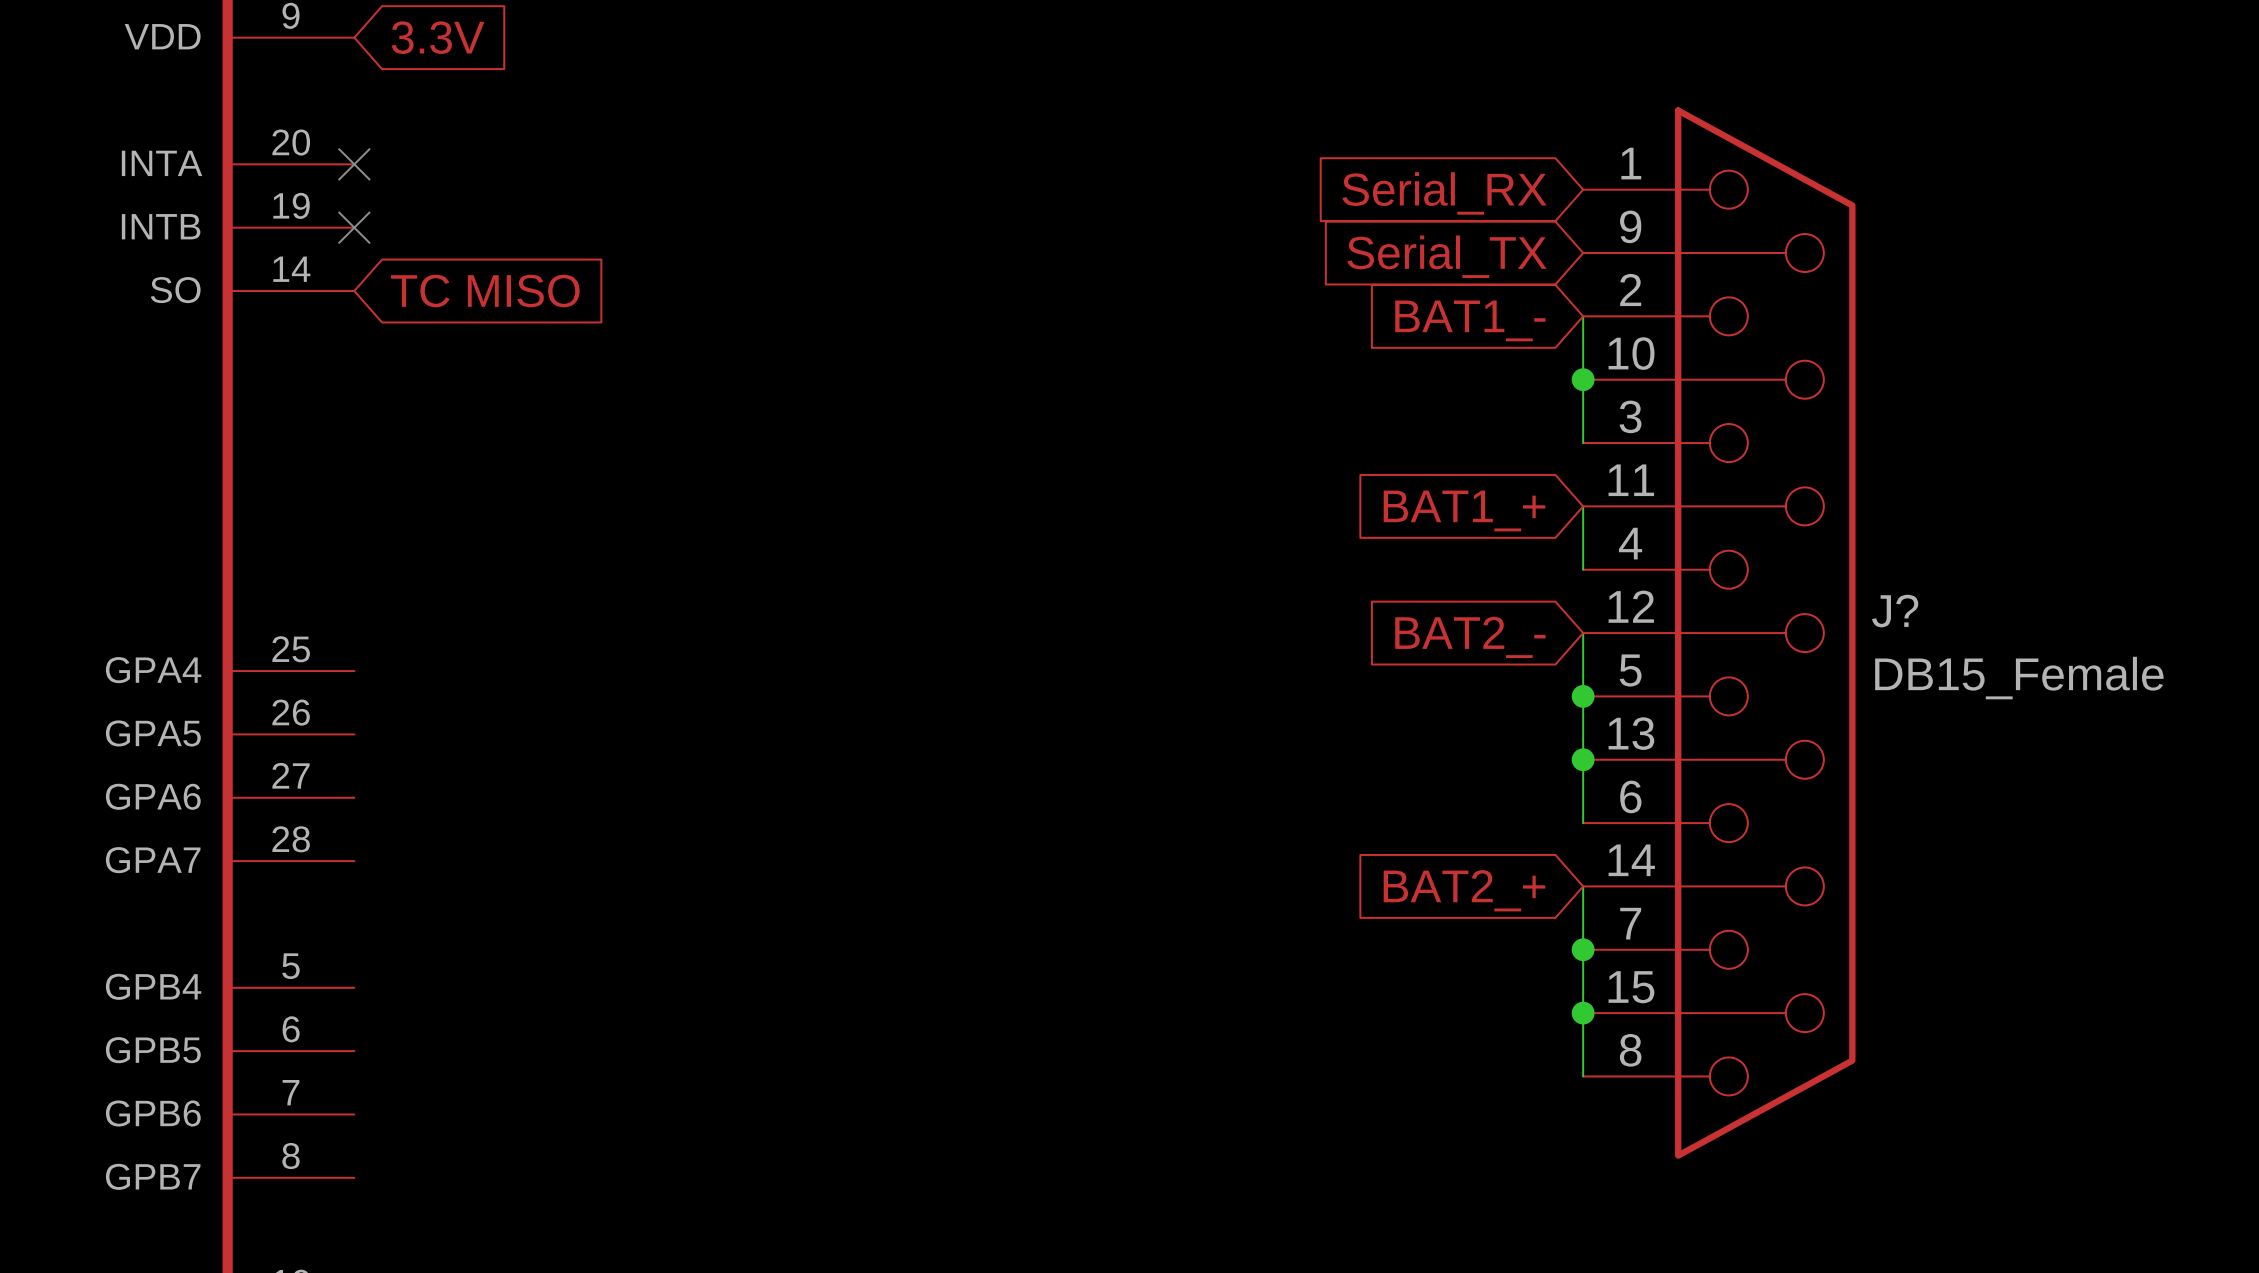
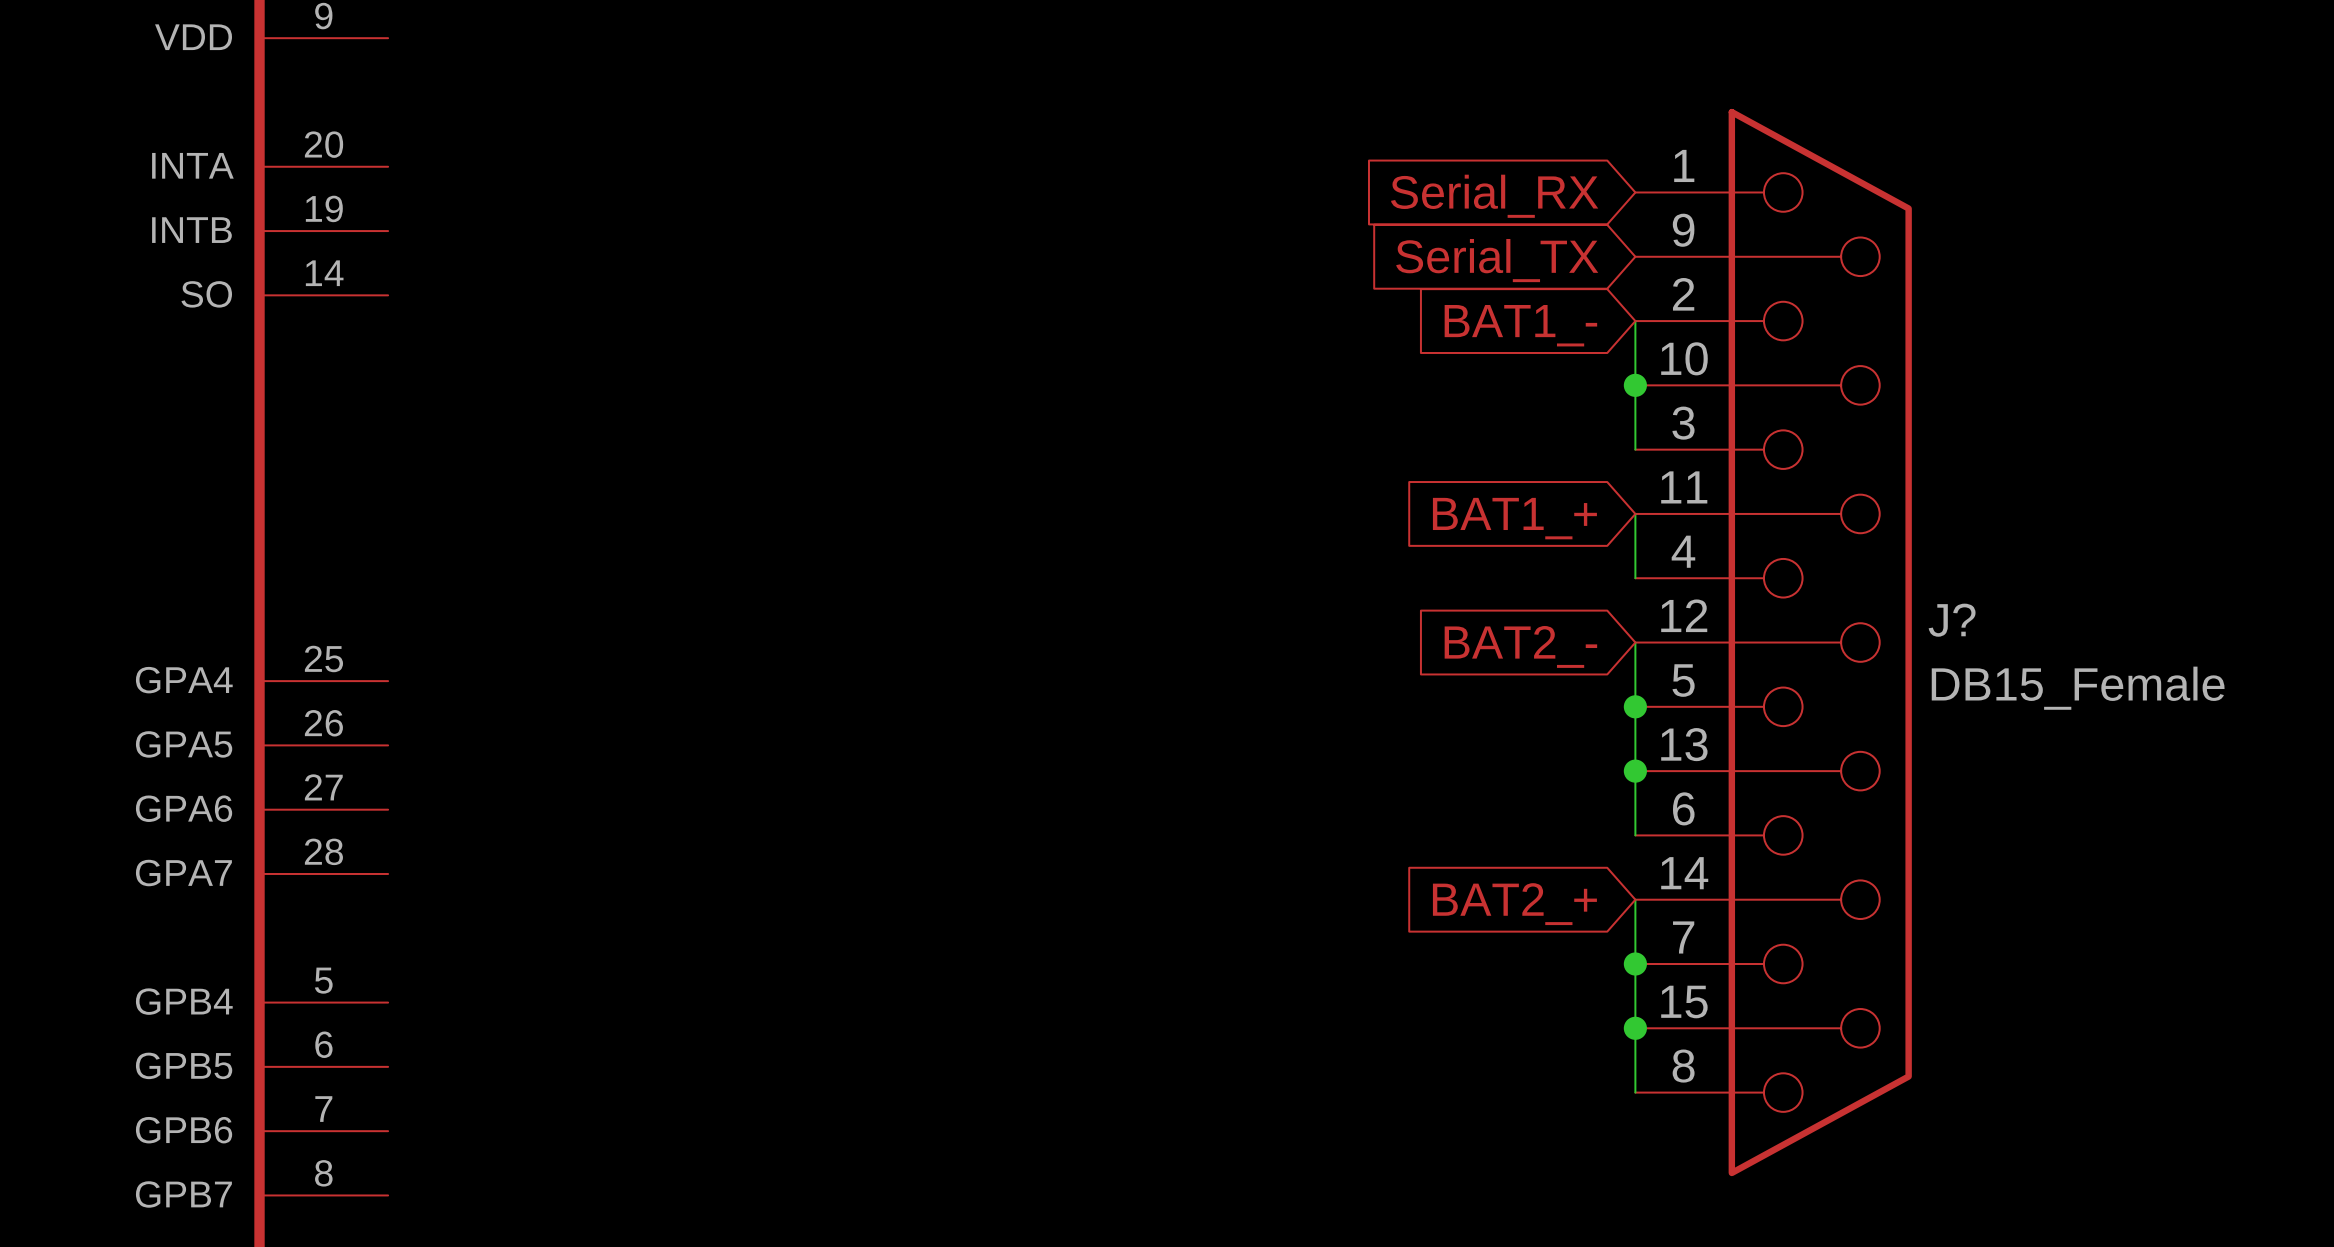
global label: 3.3V (438, 37) -> none
no-connect mark: (354, 164) -> none
no-connect mark: (354, 227) -> none
global label: TC MISO (485, 291) -> none

